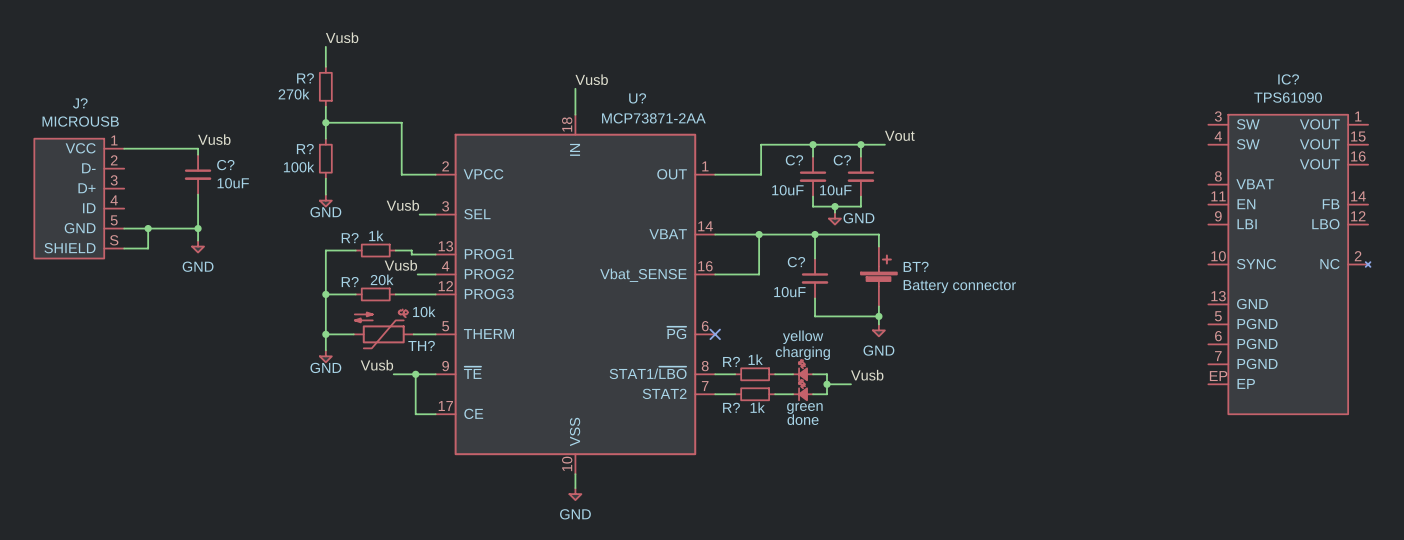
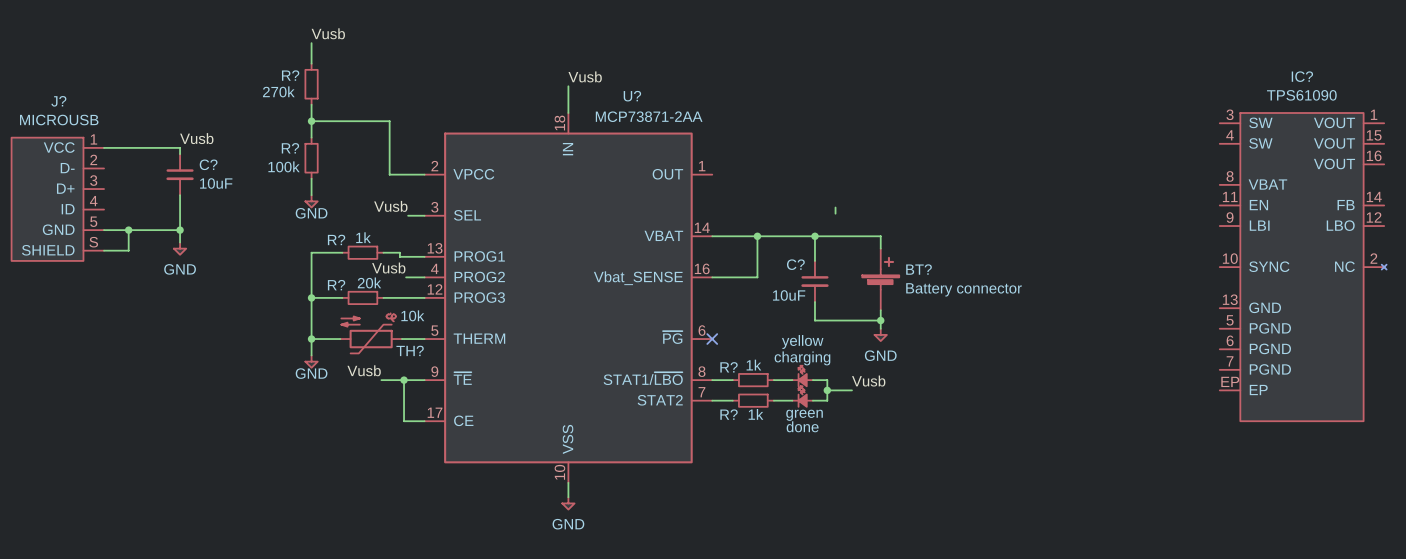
label: Vout (899, 135) -> none
wire: (813, 144) (813, 156) -> none
junction: (813, 144) -> none
wire: (860, 144) (860, 156) -> none
junction: (860, 144) -> none
wire: (884, 144) (761, 144) (761, 174) (715, 174) -> none
C?: 10uF (813, 176) -> none
C?: 10uF (860, 176) -> none
wire: (813, 196) (813, 206) (860, 206) (860, 196) -> none
junction: (834, 206) -> none
power symbol: GND (834, 218) -> none

